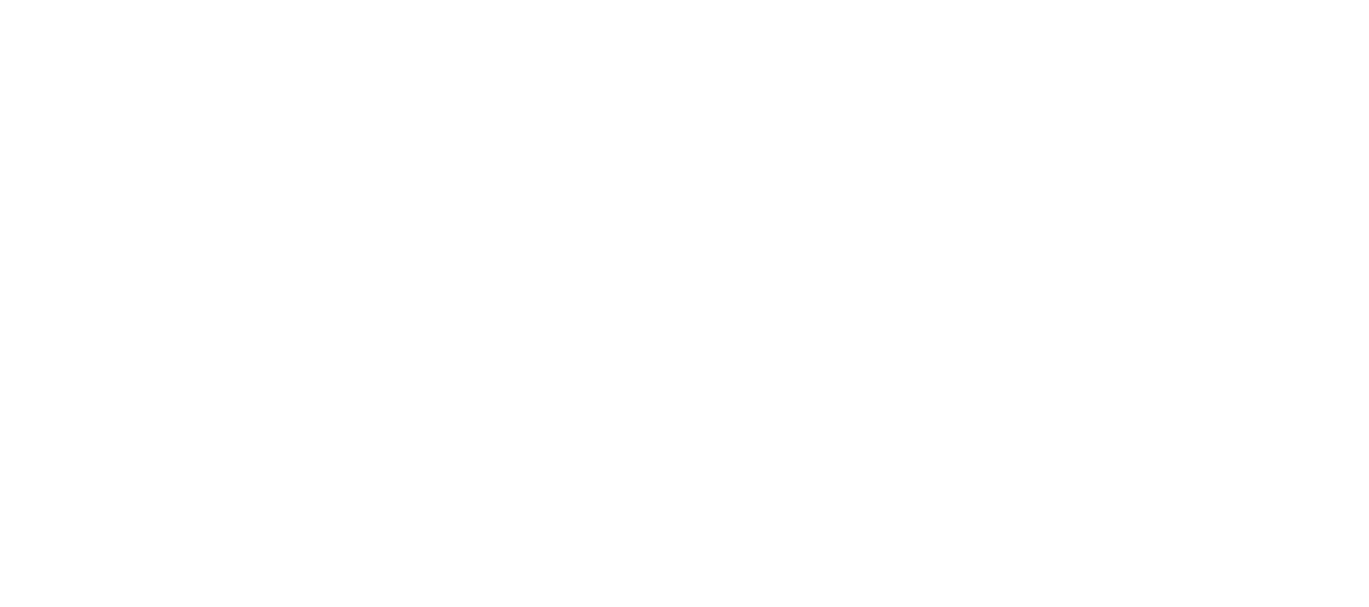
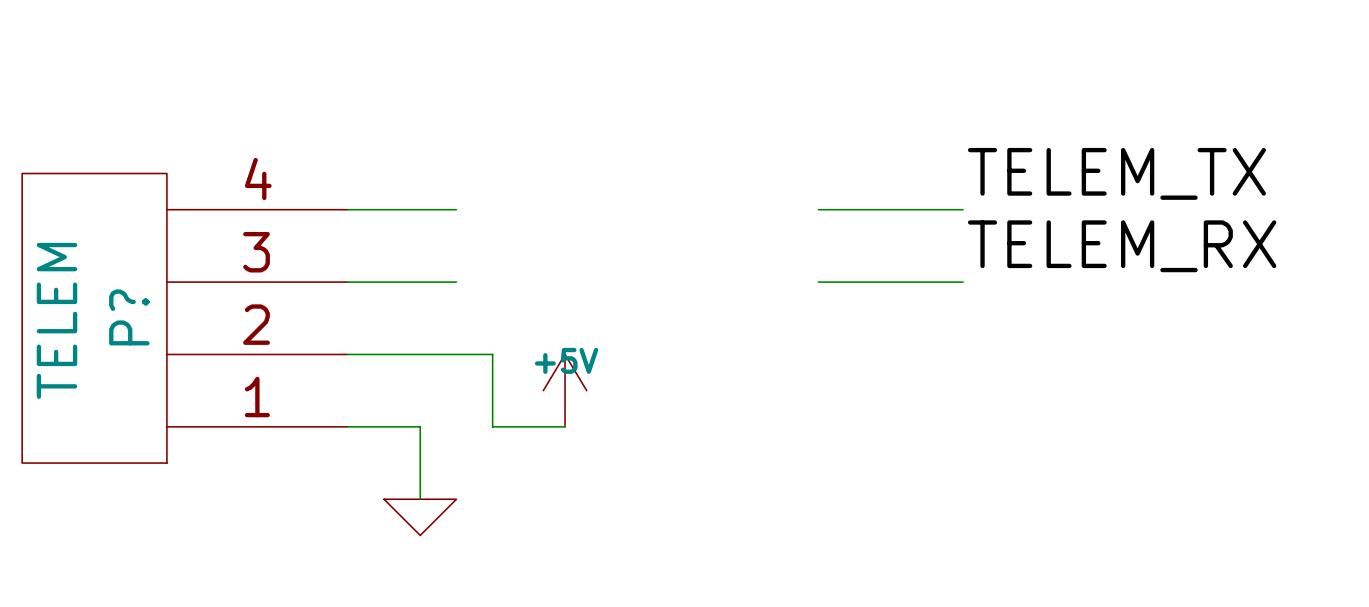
label: none -> TELEM_TX (1116, 173)
wire: none -> (347, 209) (456, 209)
wire: none -> (818, 209) (963, 209)
label: none -> TELEM_RX (1122, 246)
wire: none -> (347, 282) (456, 282)
wire: none -> (818, 282) (963, 282)
P?: none -> TELEM (185, 318)
wire: none -> (347, 354) (492, 354) (492, 426) (565, 426)
power symbol: none -> +5V (565, 390)
wire: none -> (347, 426) (420, 426) (420, 499)
power symbol: none -> (420, 517)

